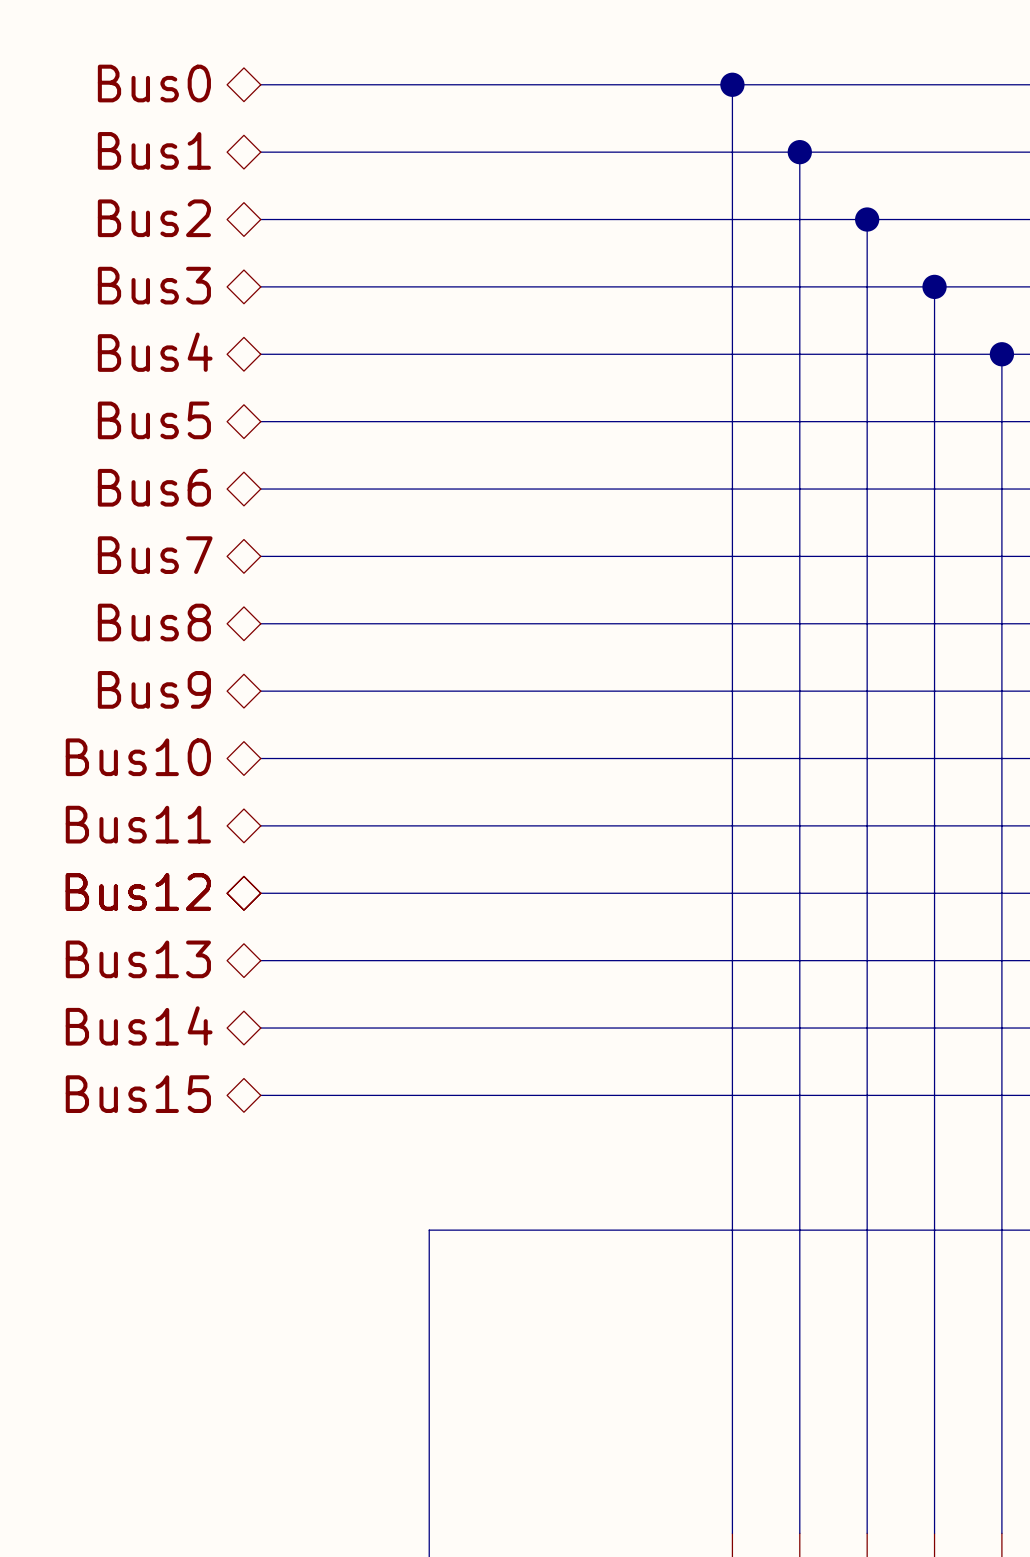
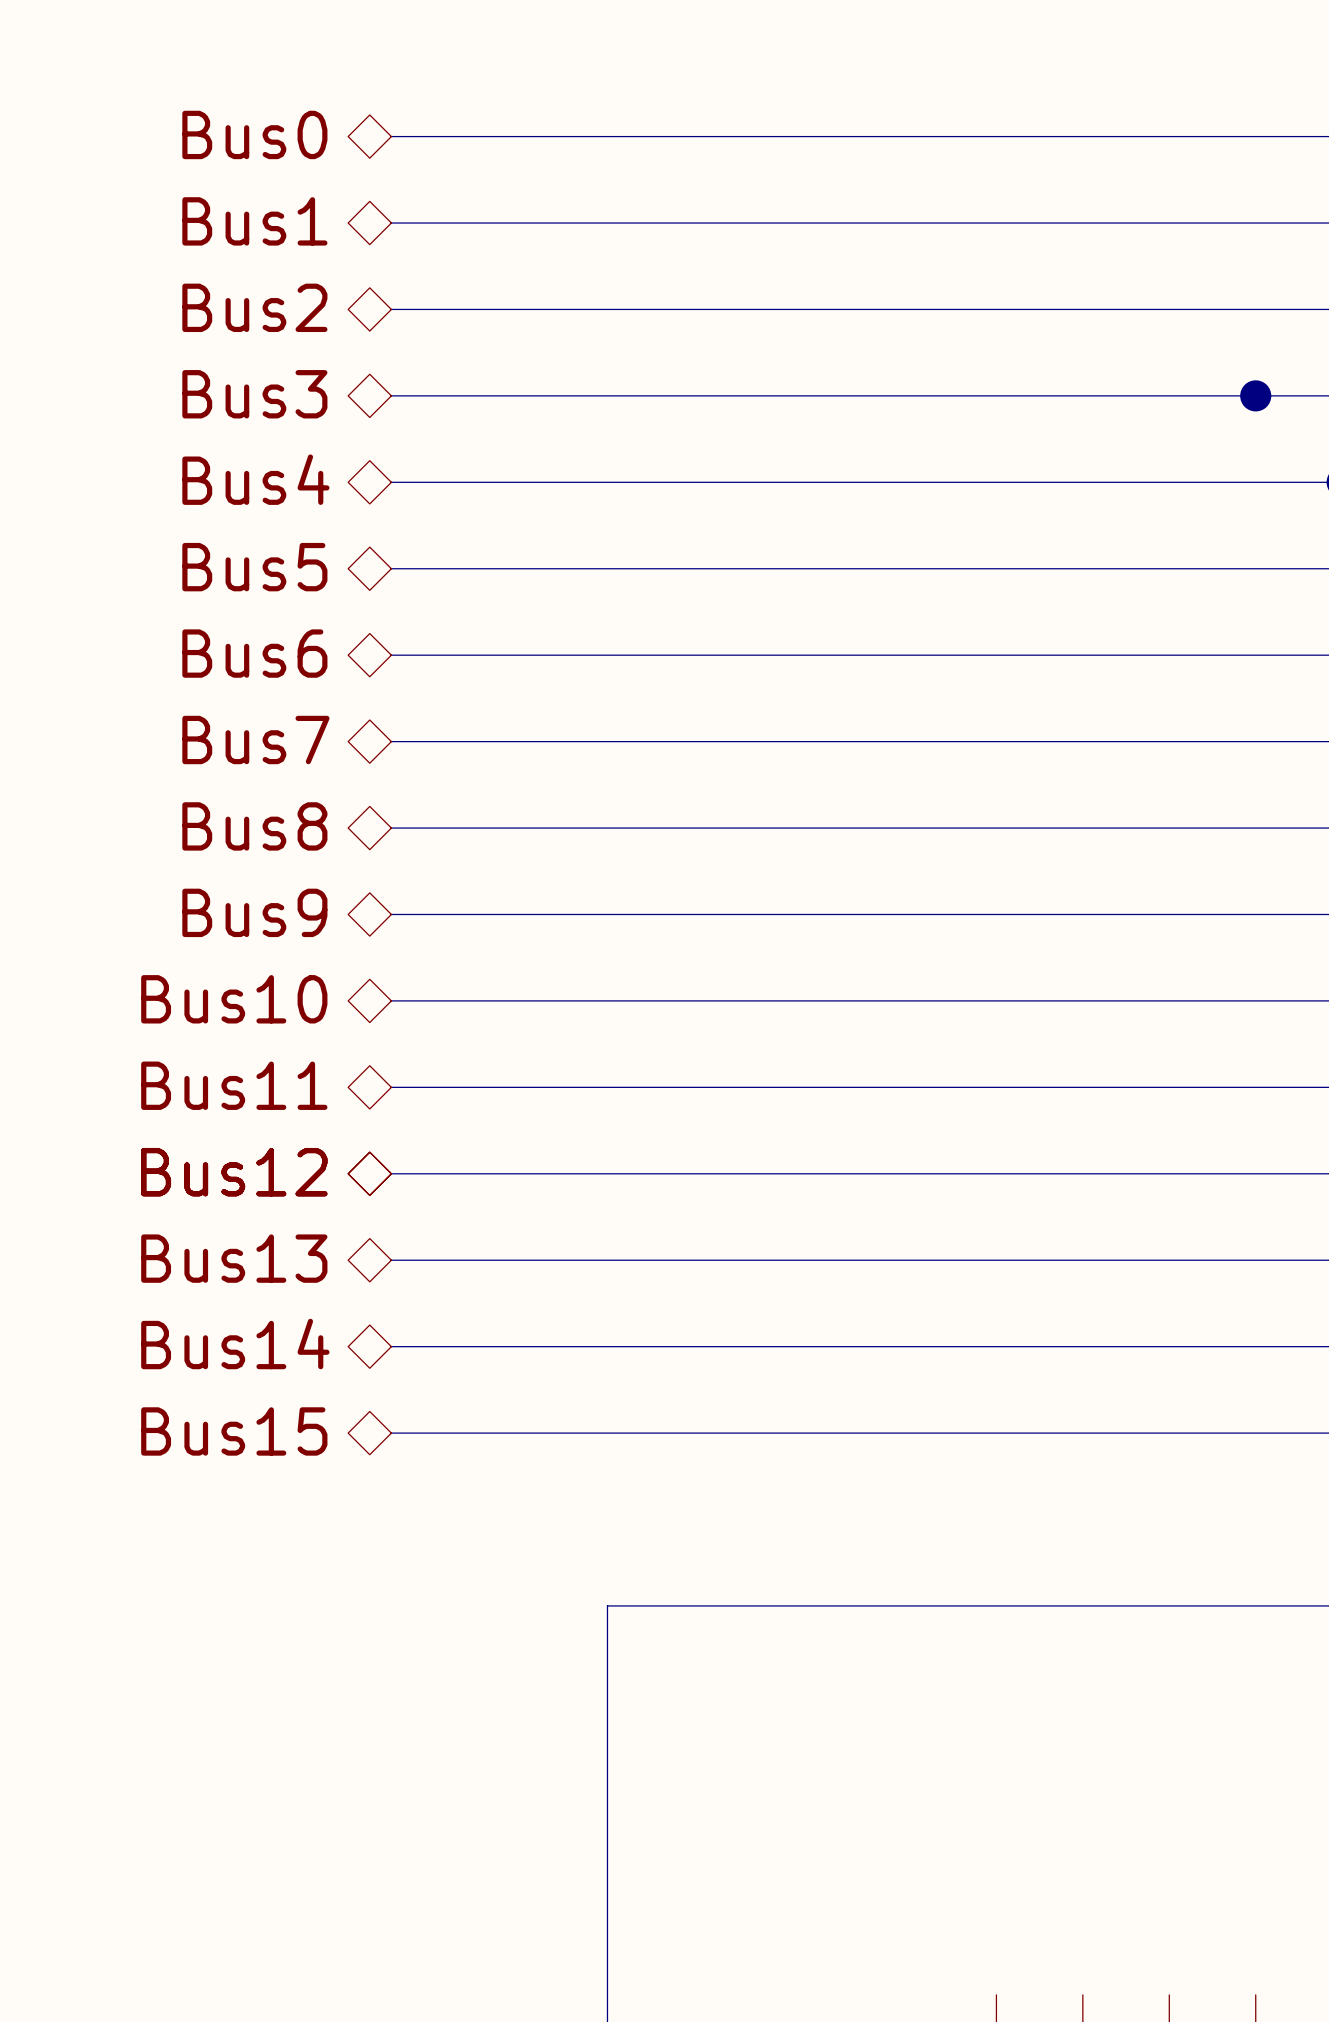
wire: (732, 84) (732, 1533) -> none
junction: (732, 84) -> none
wire: (799, 152) (799, 1533) -> none
junction: (799, 152) -> none
wire: (867, 219) (867, 1533) -> none
junction: (867, 219) -> none
wire: (934, 286) (934, 1533) -> none

